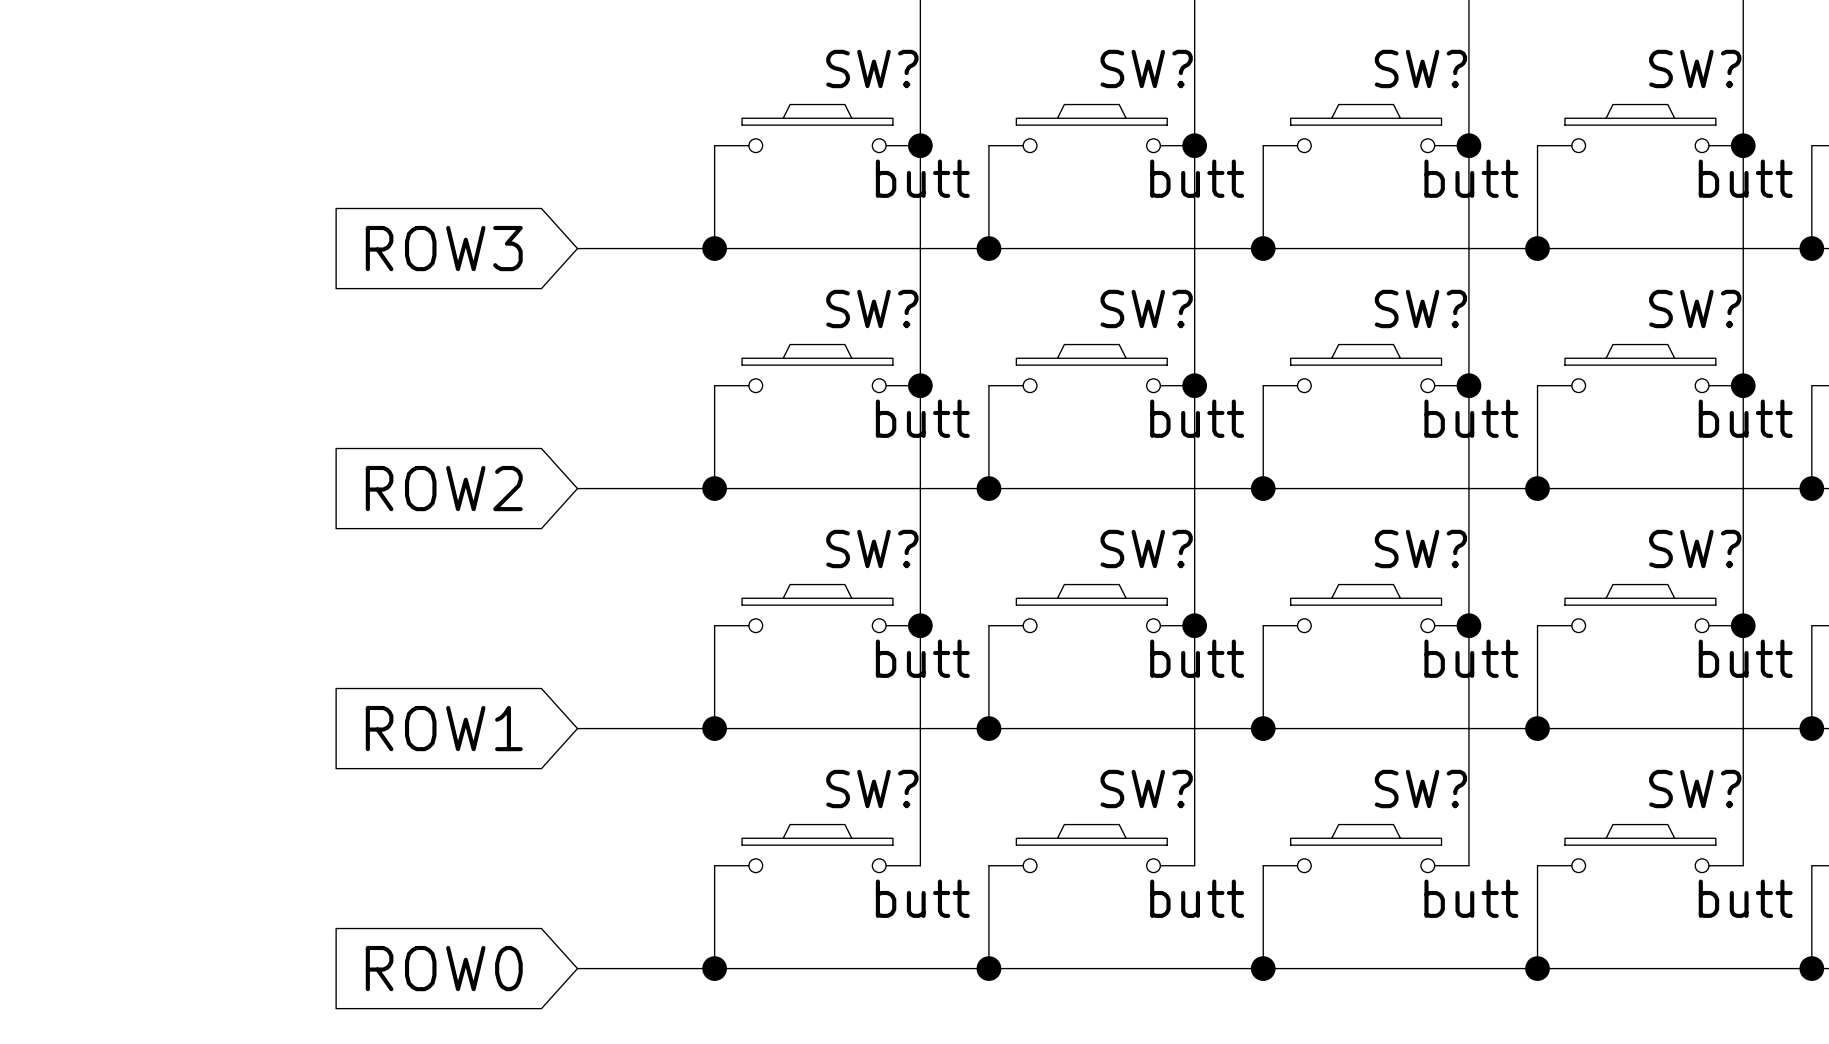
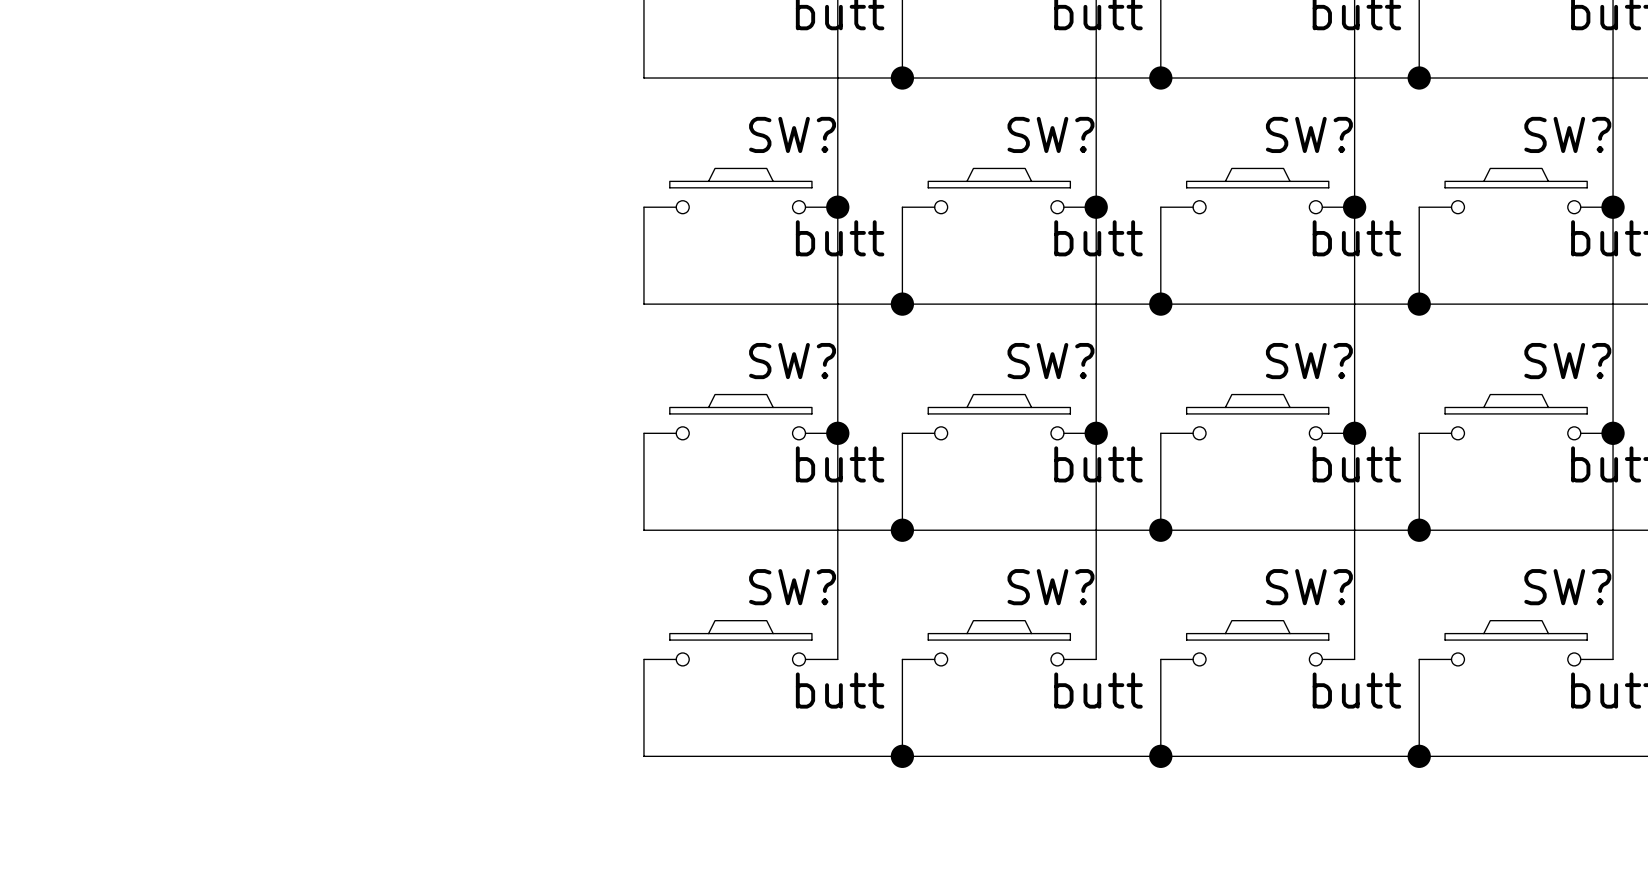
global label: ROW3 (444, 248) -> none
wire: (577, 248) (714, 248) -> none
junction: (714, 248) -> none
global label: ROW2 (444, 488) -> none
wire: (577, 488) (714, 488) -> none
junction: (714, 488) -> none
global label: ROW1 (444, 728) -> none
wire: (577, 728) (714, 728) -> none
junction: (714, 728) -> none
global label: ROW0 (444, 968) -> none
wire: (577, 968) (714, 968) -> none
junction: (714, 968) -> none

